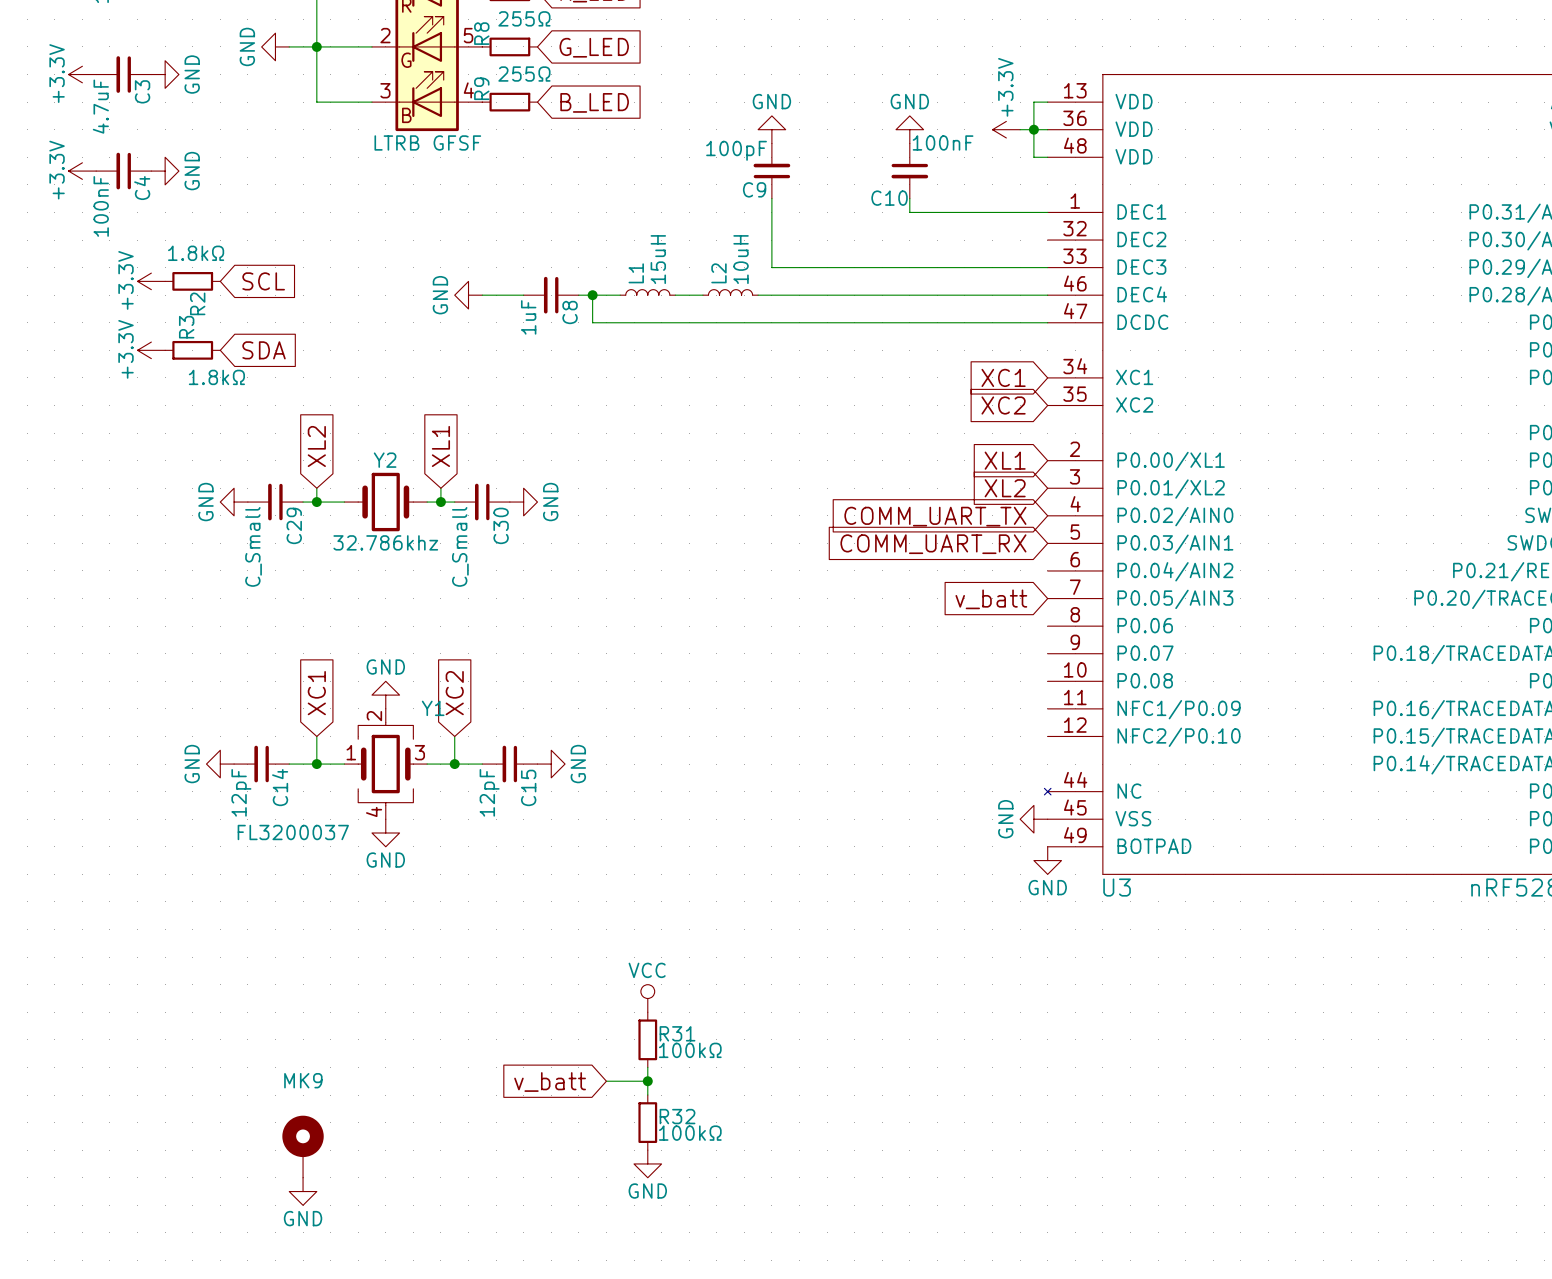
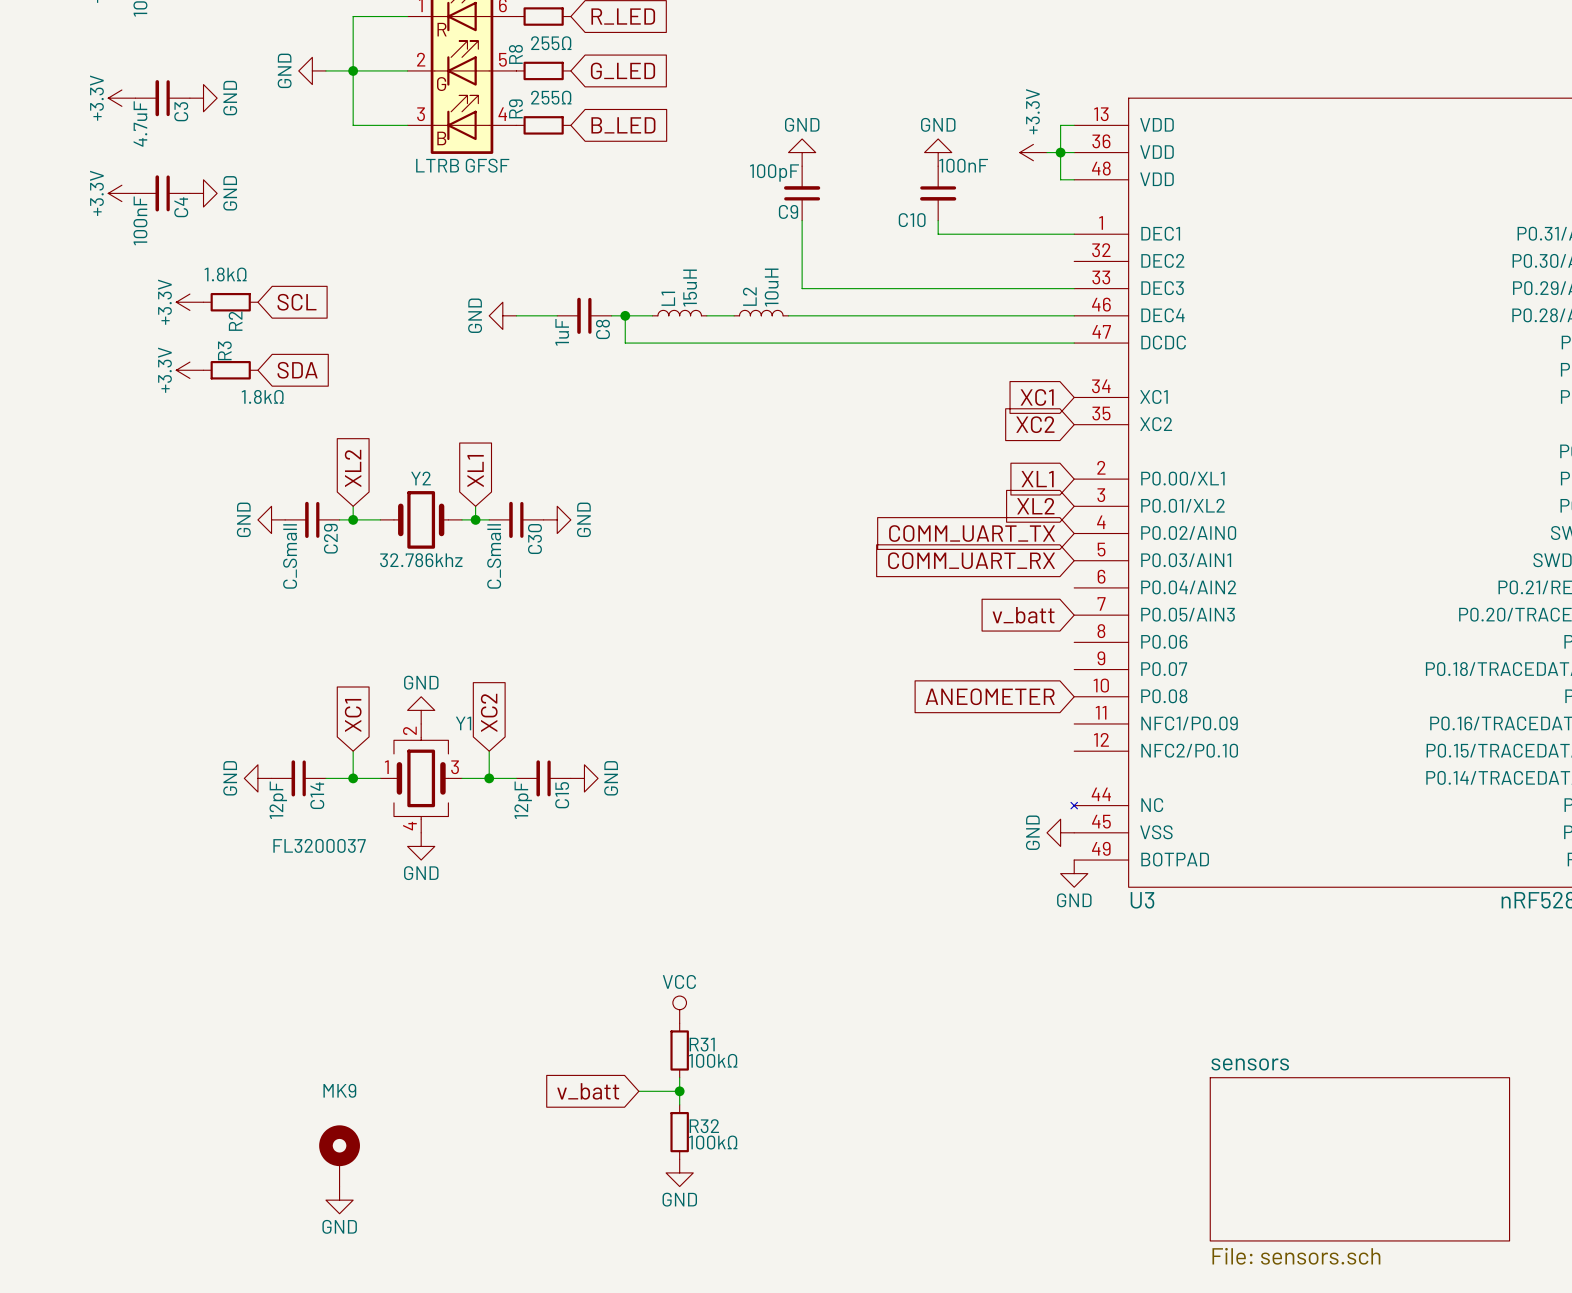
global label: none -> ANEOMETER (990, 696)
sheet sensors: none -> File: sensors.sch (1359, 1159)

